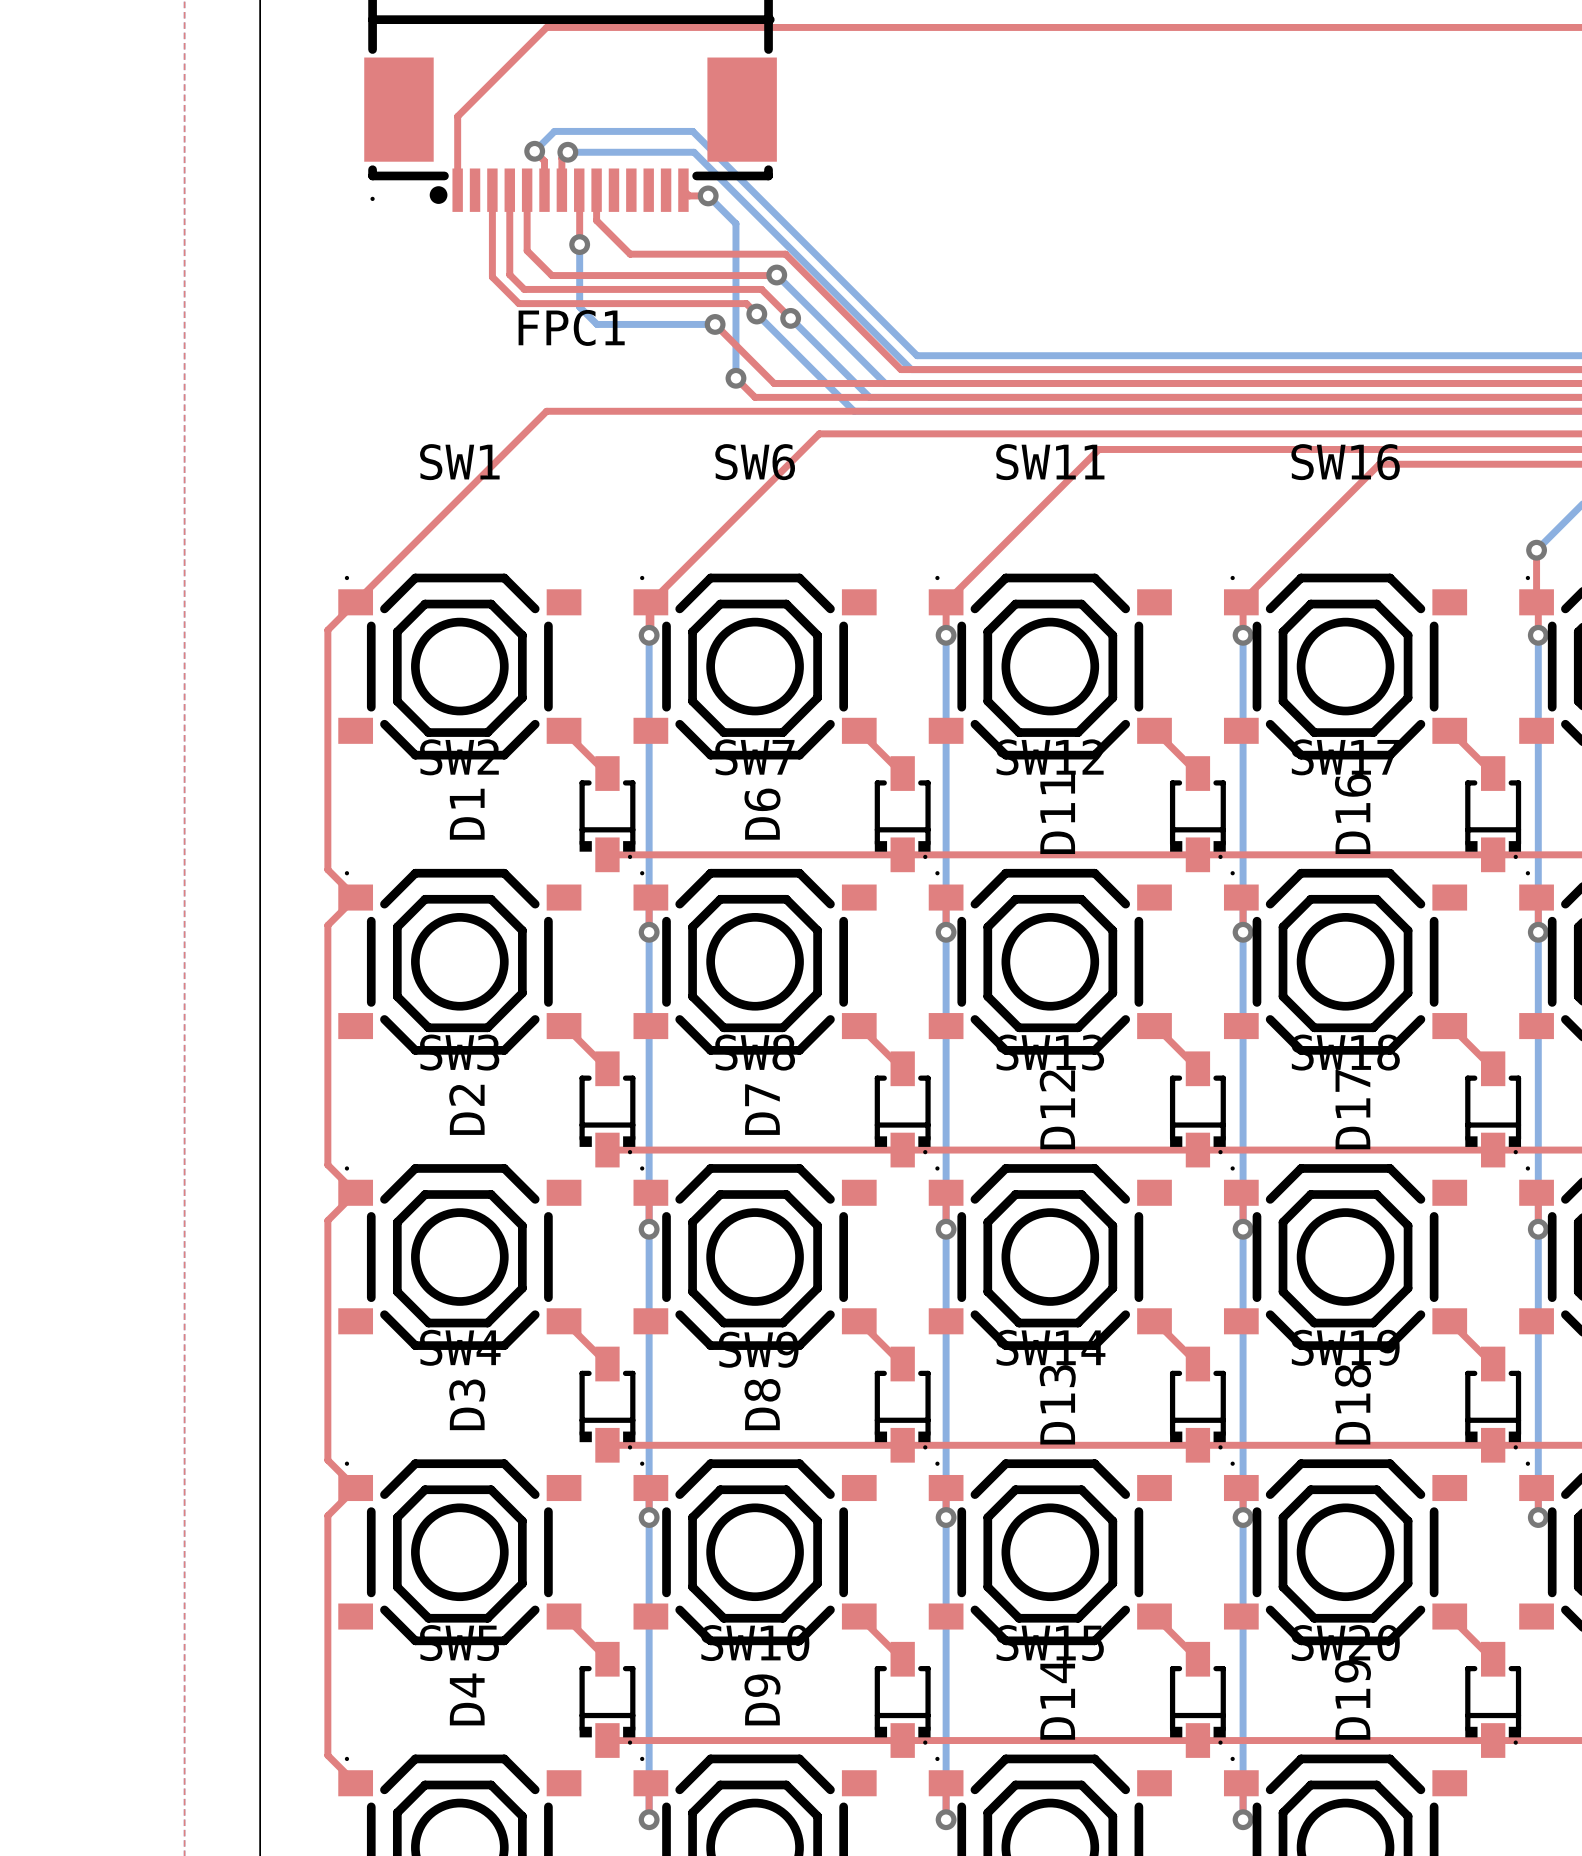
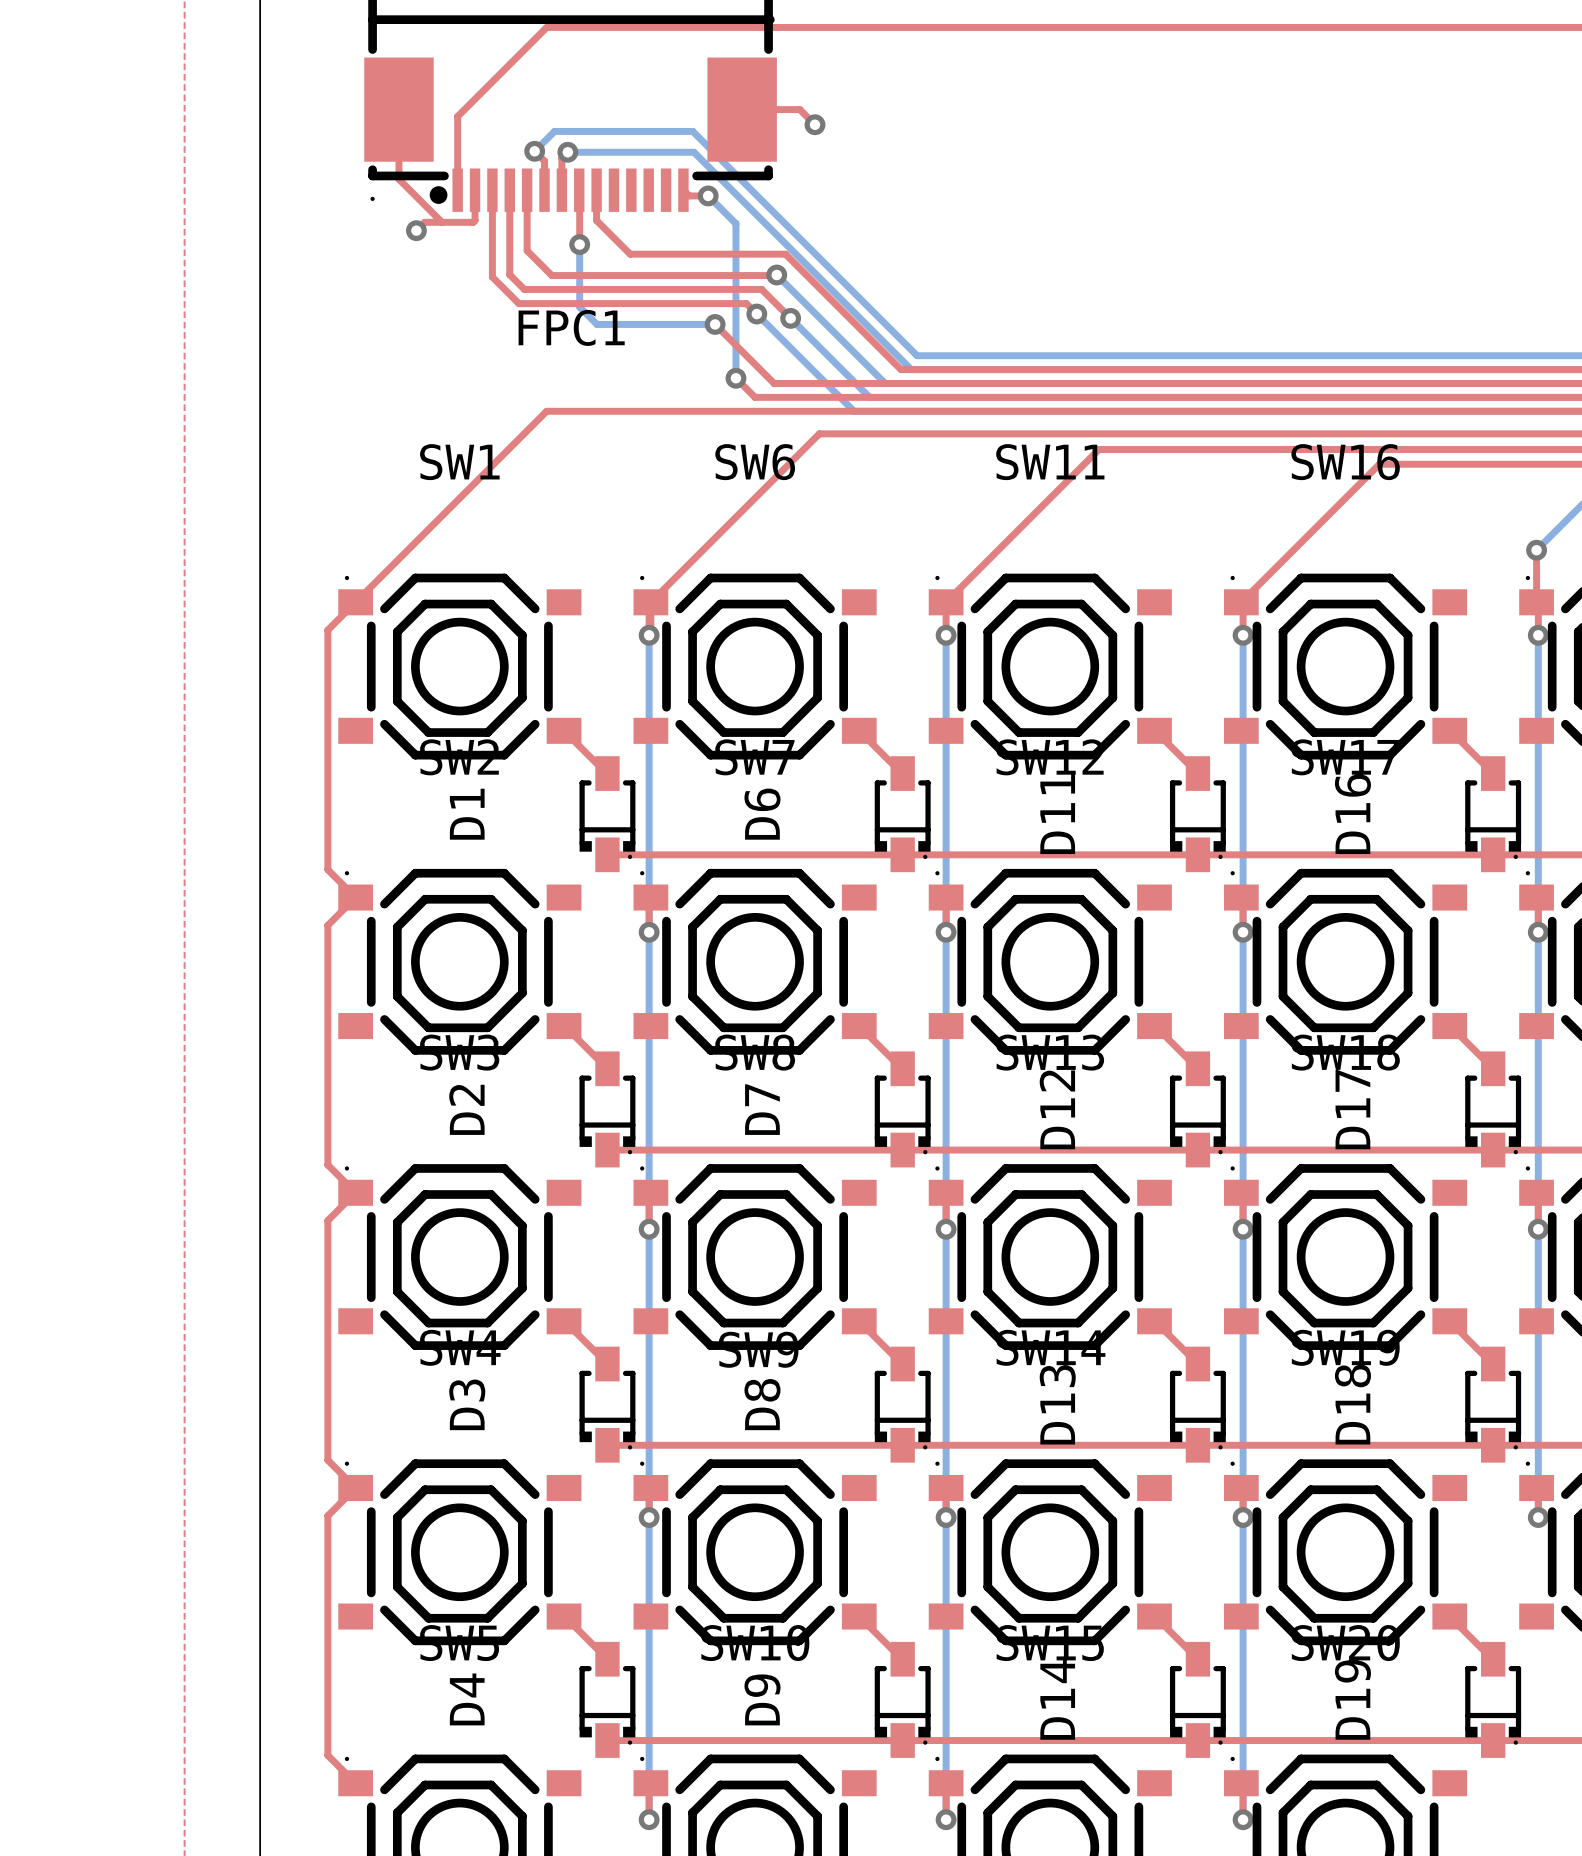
top track: none -> (398, 109) (398, 179) (442, 222)
top track: none -> (742, 109) (799, 109) (814, 124)
via: none -> (814, 124)
top track: none -> (475, 190) (475, 220) (473, 222) (424, 222) (416, 230)
via: none -> (416, 230)

